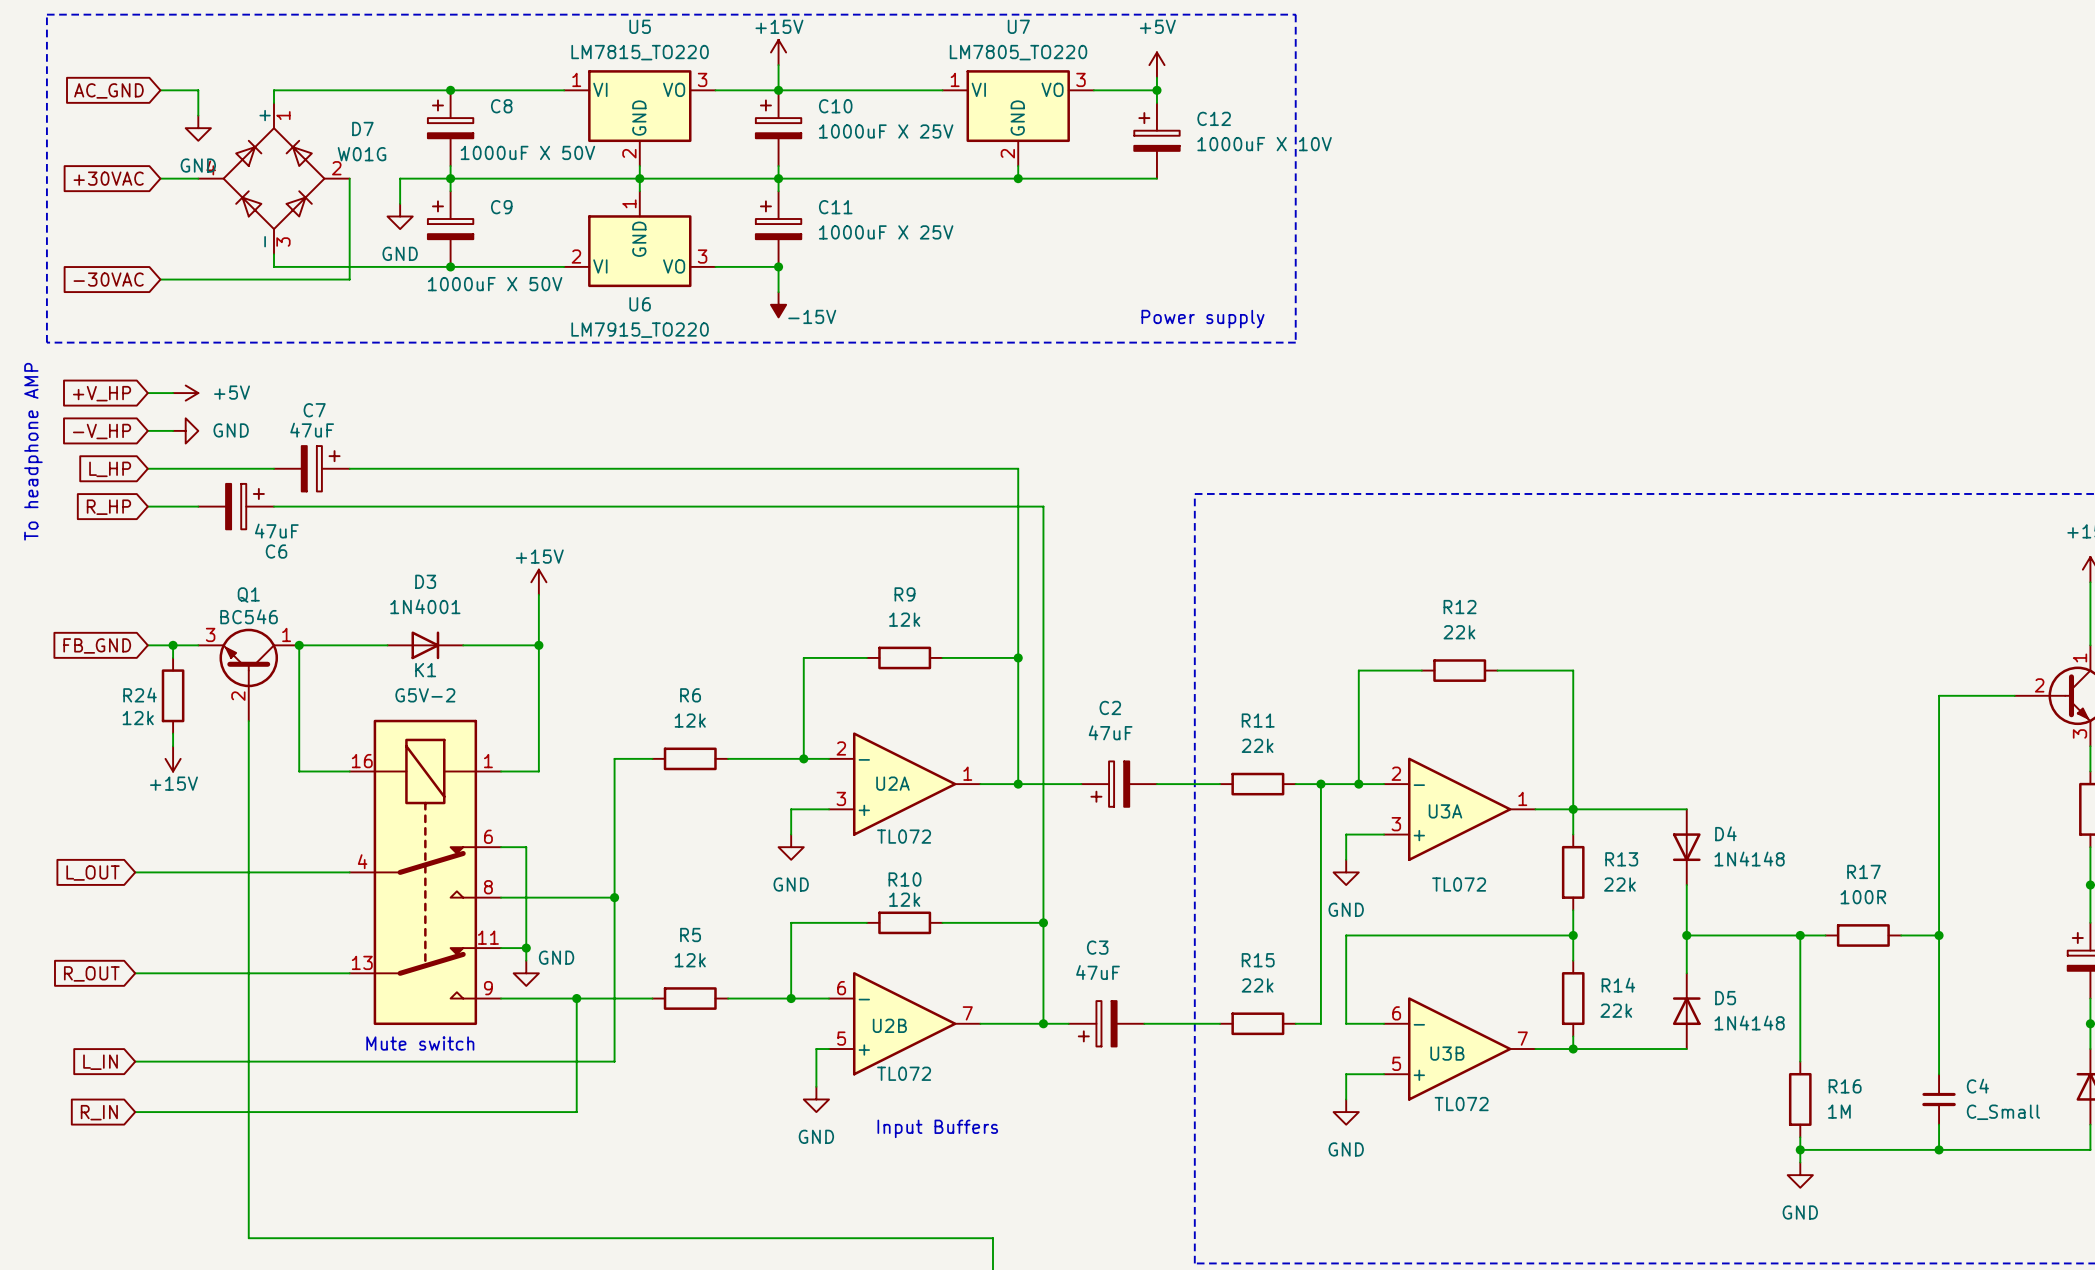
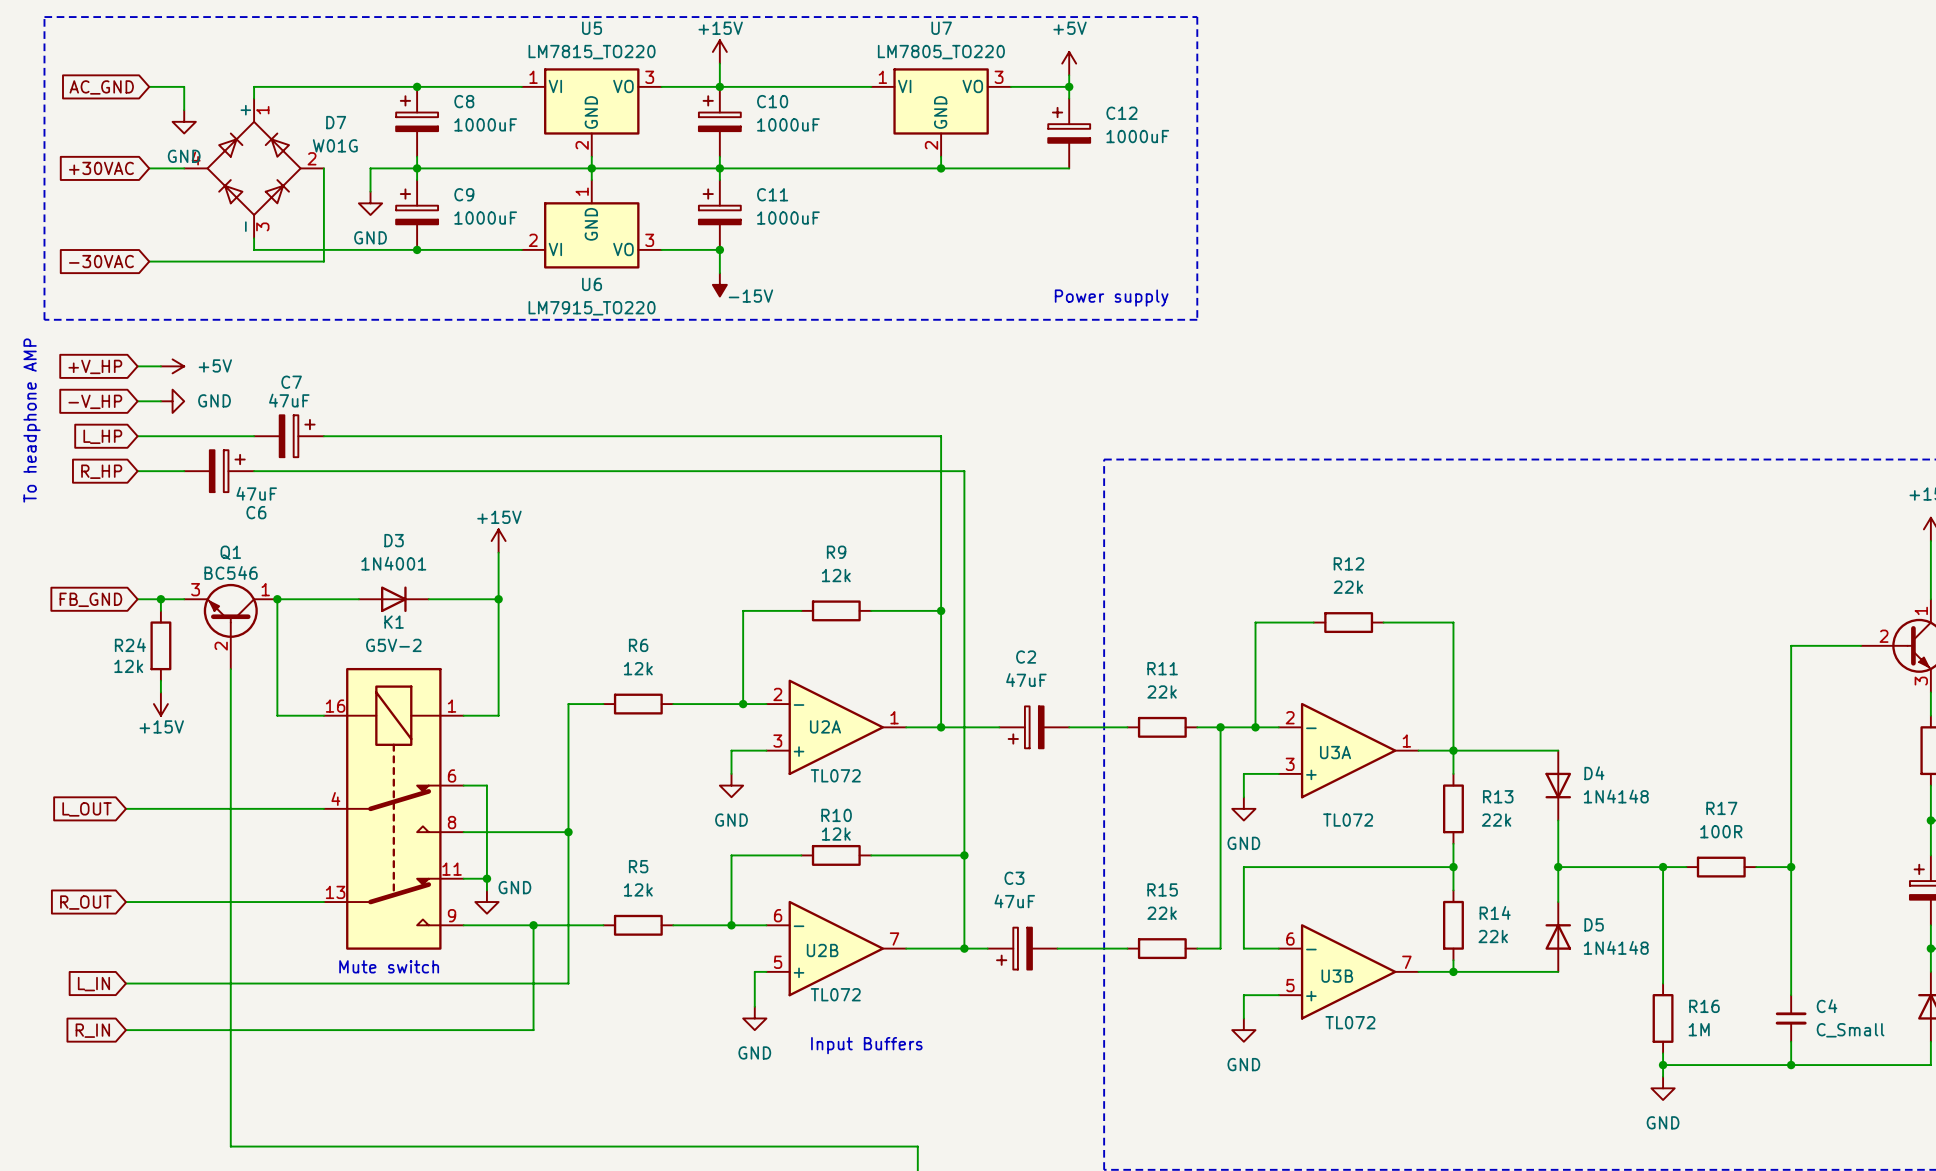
C10 value: 1000uF X 25V (886, 131) -> 1000uF (788, 124)
C12 value: 1000uF X 10V (1264, 144) -> 1000uF (1137, 136)
C8 value: 1000uF X 50V (527, 152) -> 1000uF (485, 124)
C11 value: 1000uF X 25V (886, 232) -> 1000uF (788, 218)
C9 value: 1000uF X 50V (495, 284) -> 1000uF (485, 218)

